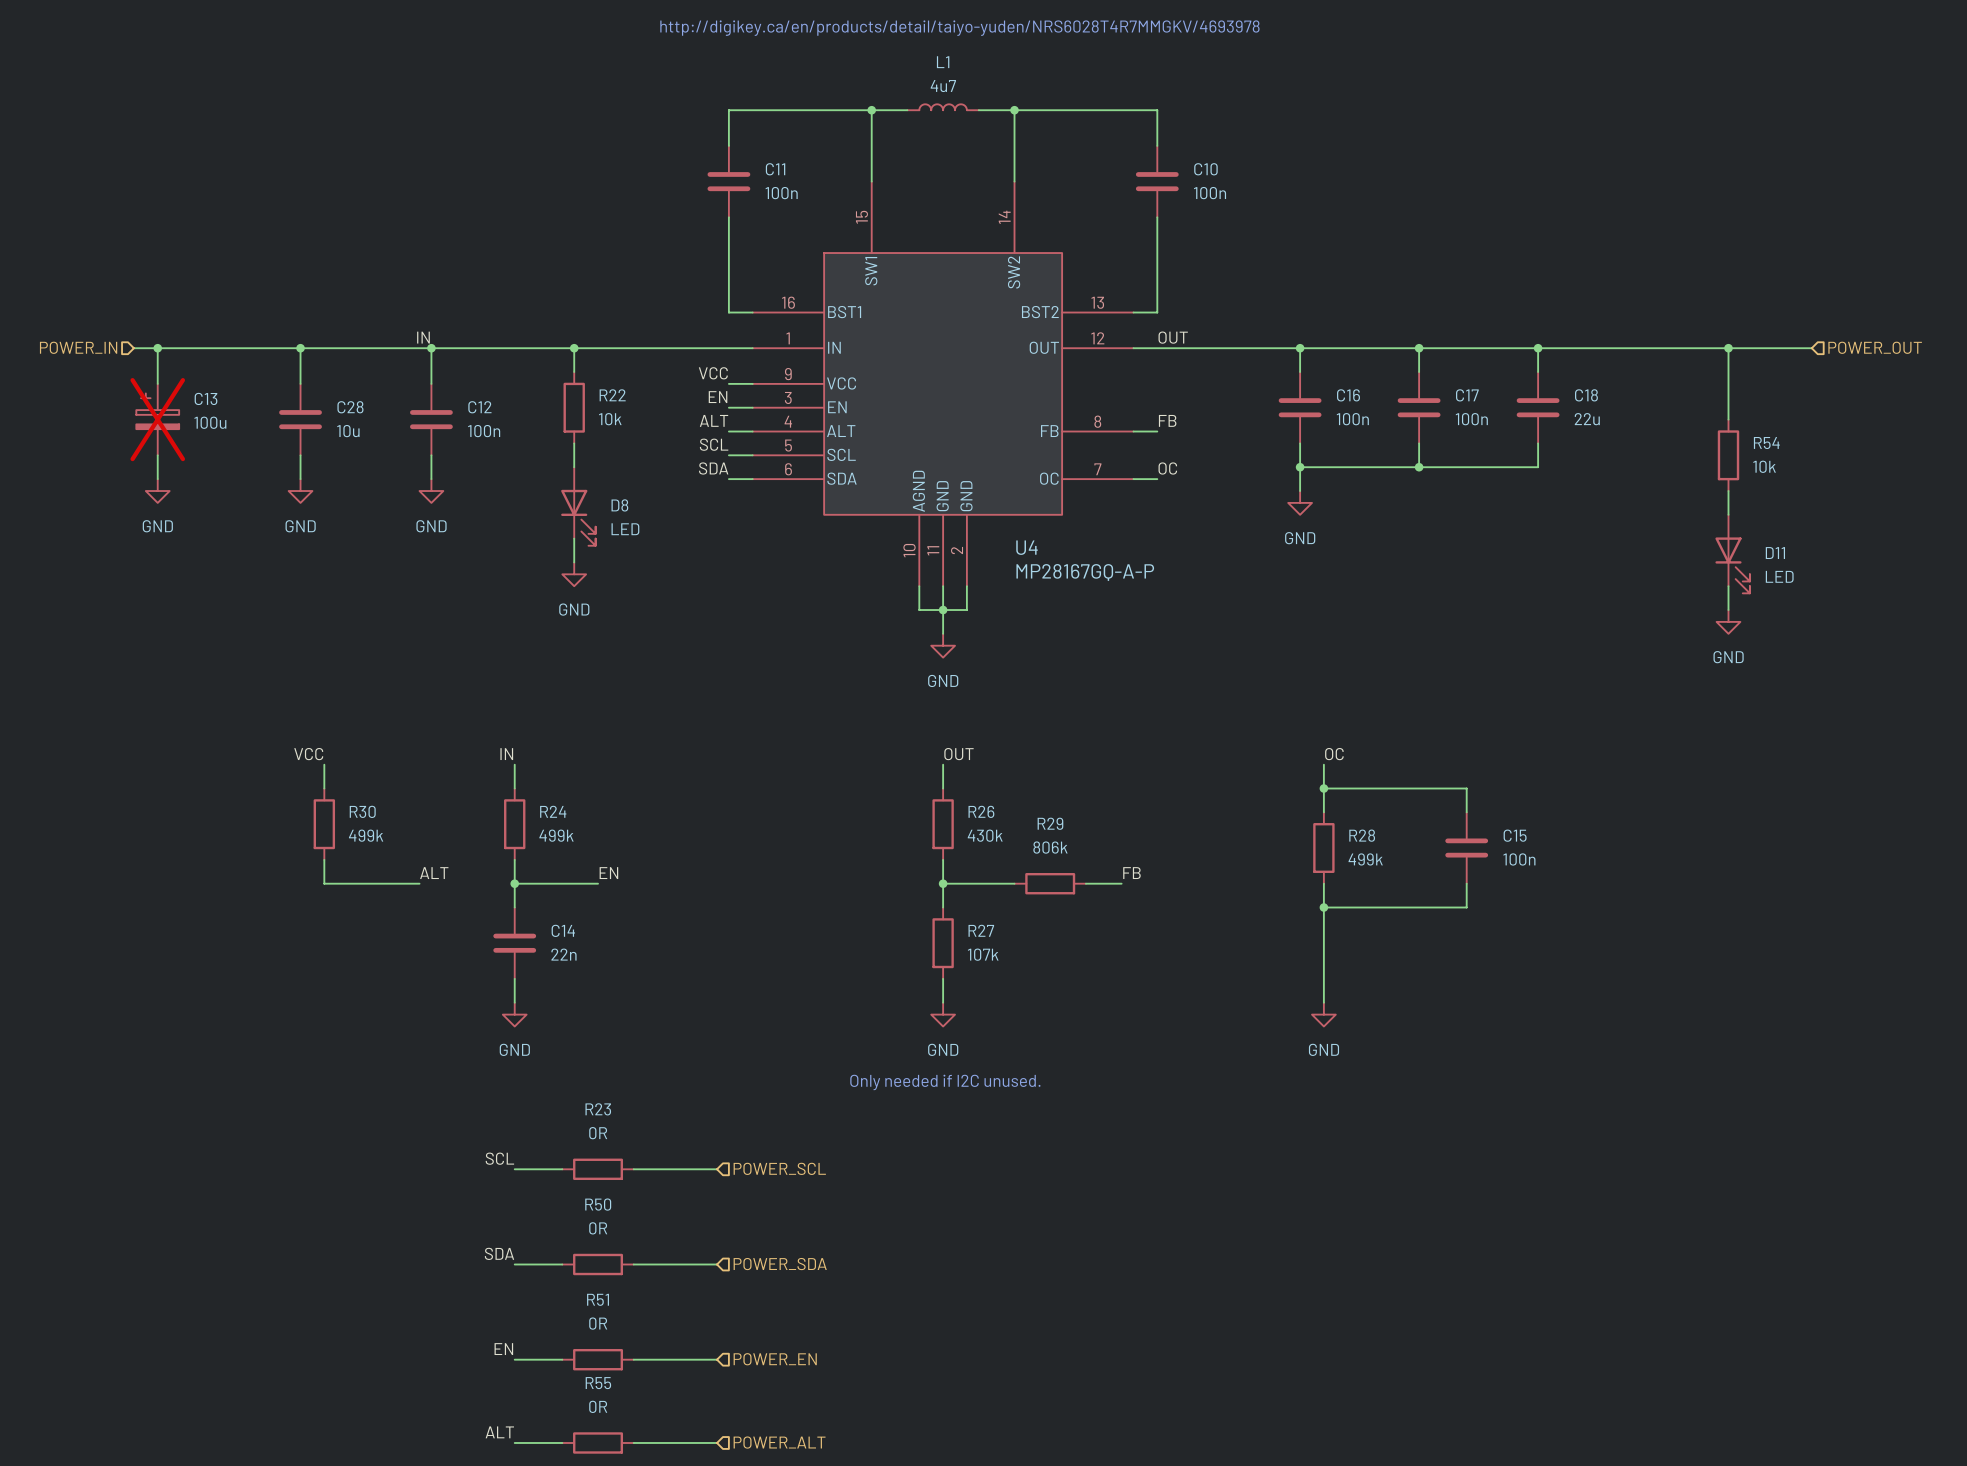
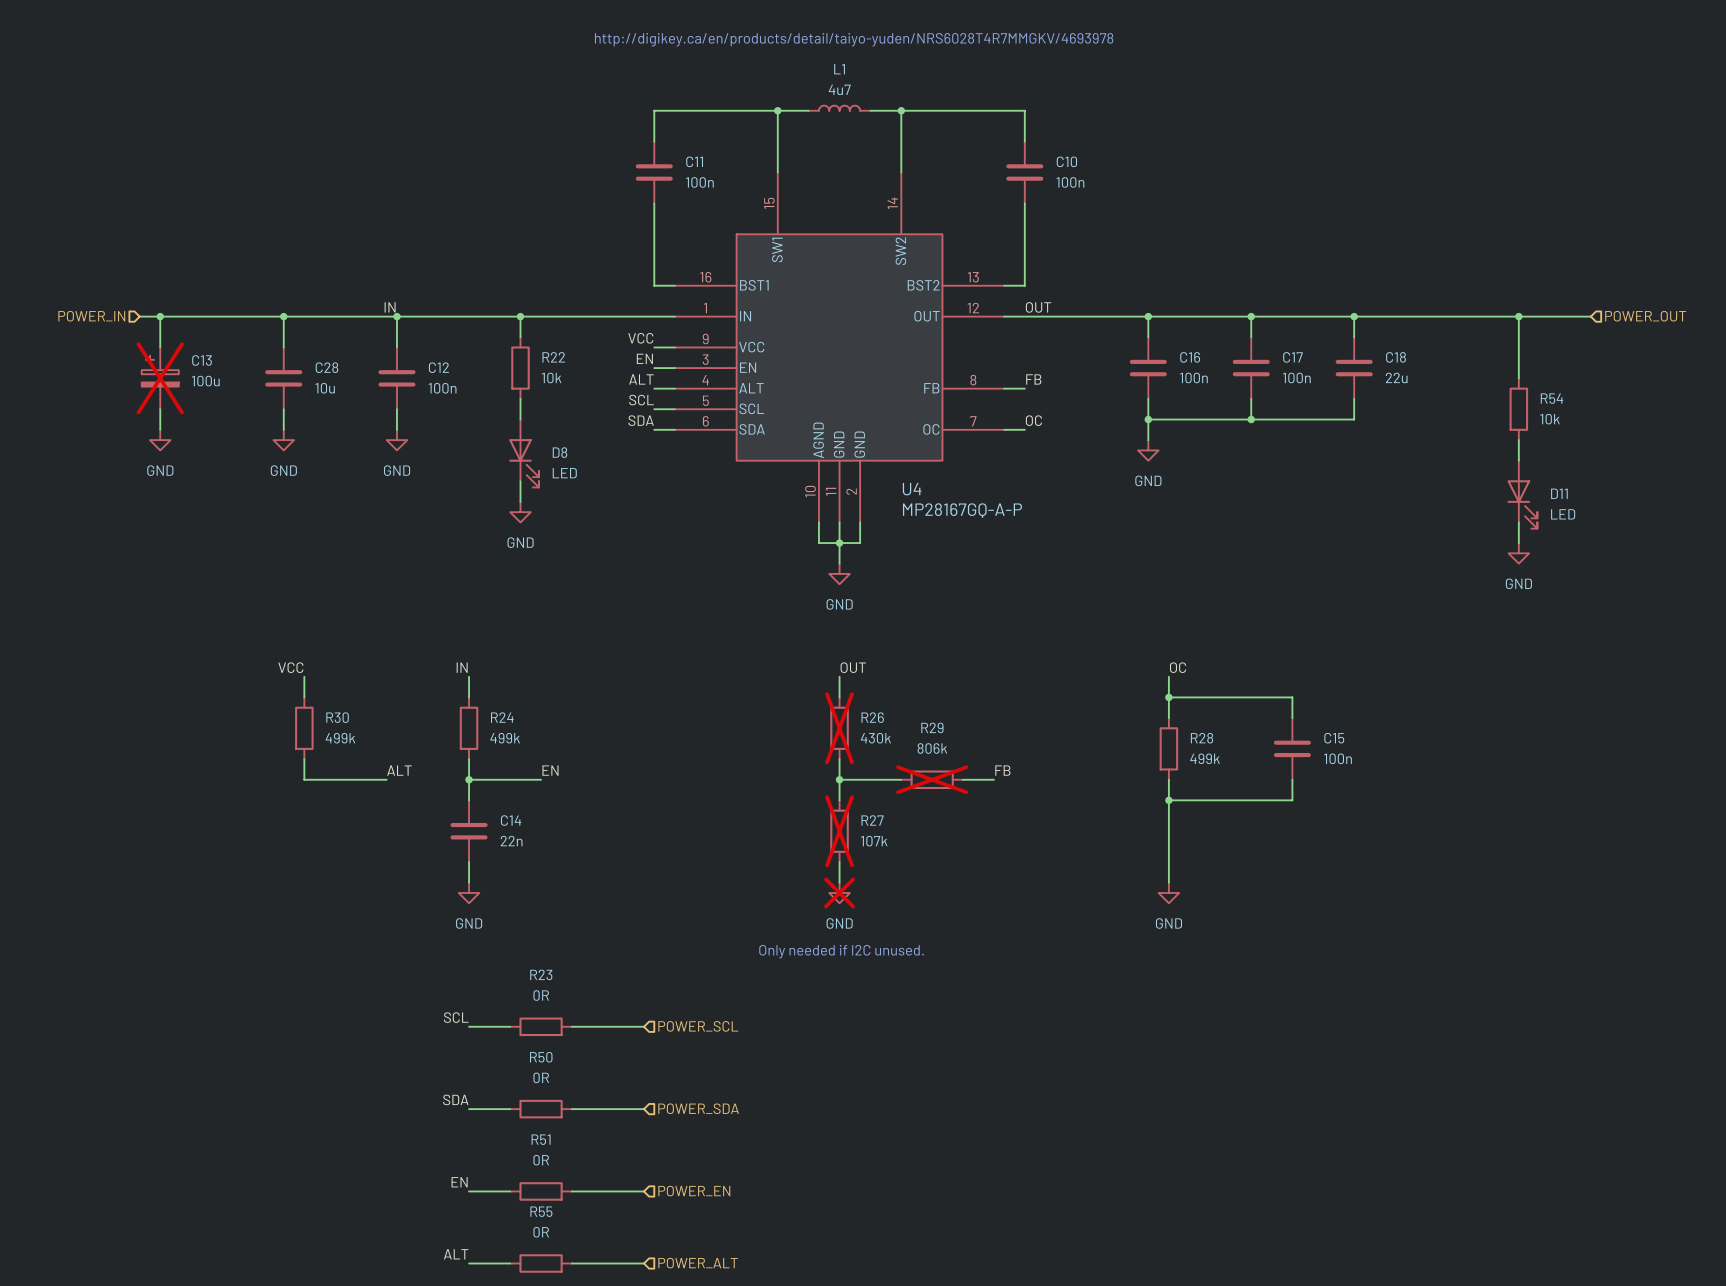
R26 do-not-place cross: none -> (839, 728)
R29 do-not-place cross: none -> (932, 779)
R27 do-not-place cross: none -> (839, 831)
power symbol do-not-place cross: none -> (839, 892)

